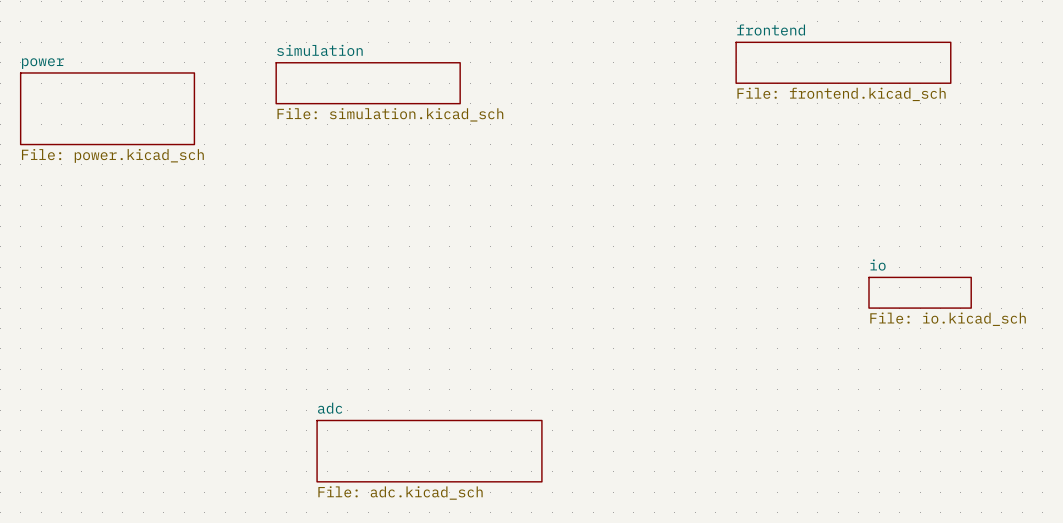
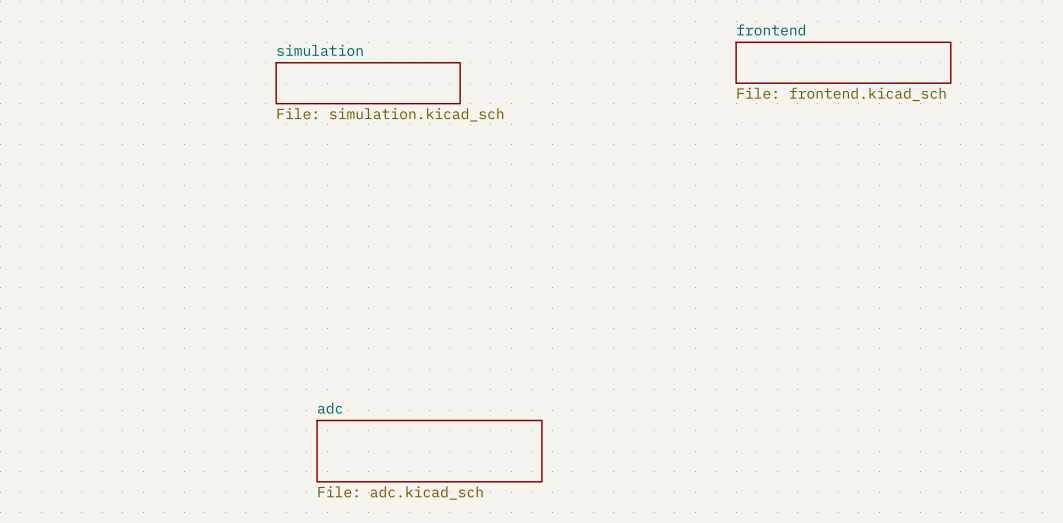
sheet power: File: power.kicad_sch (107, 108) -> none
sheet io: File: io.kicad_sch (920, 292) -> none

